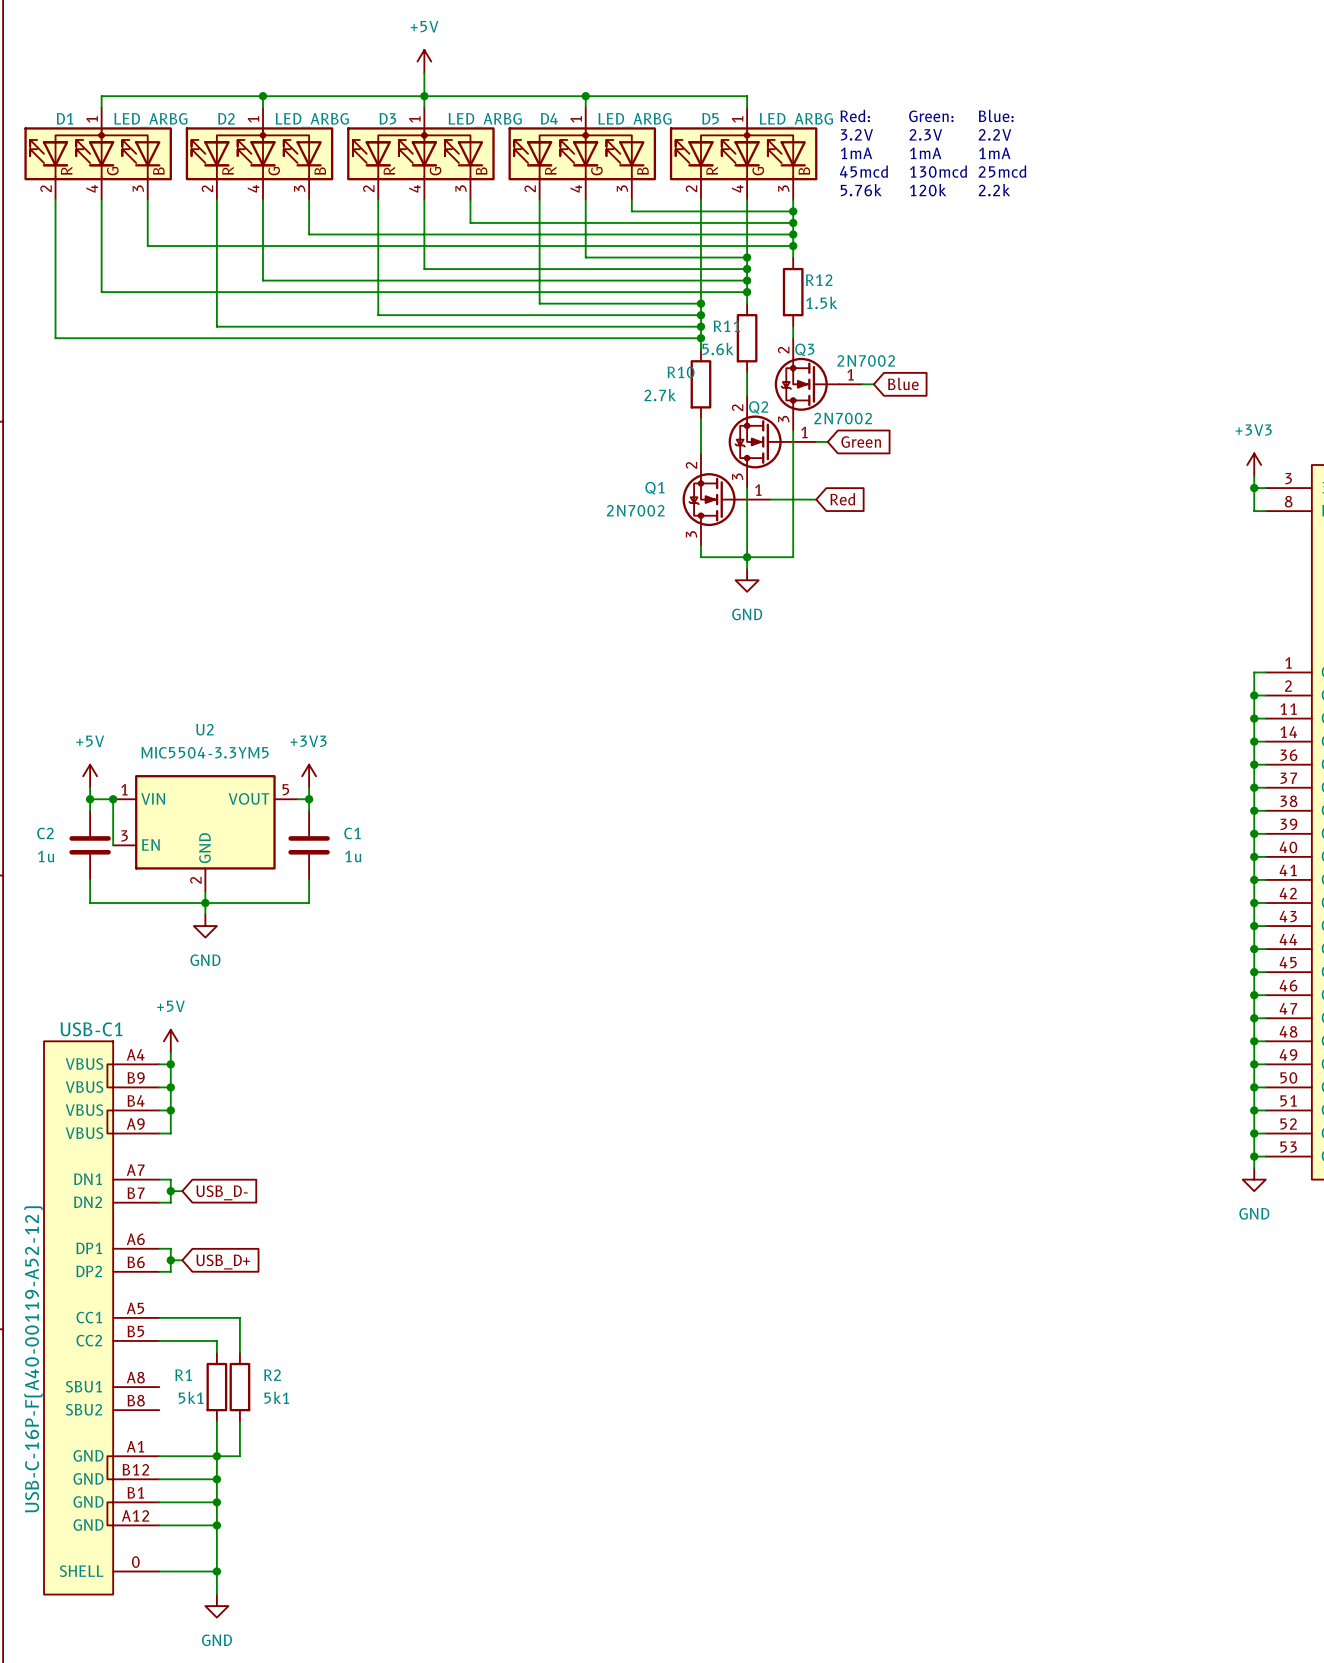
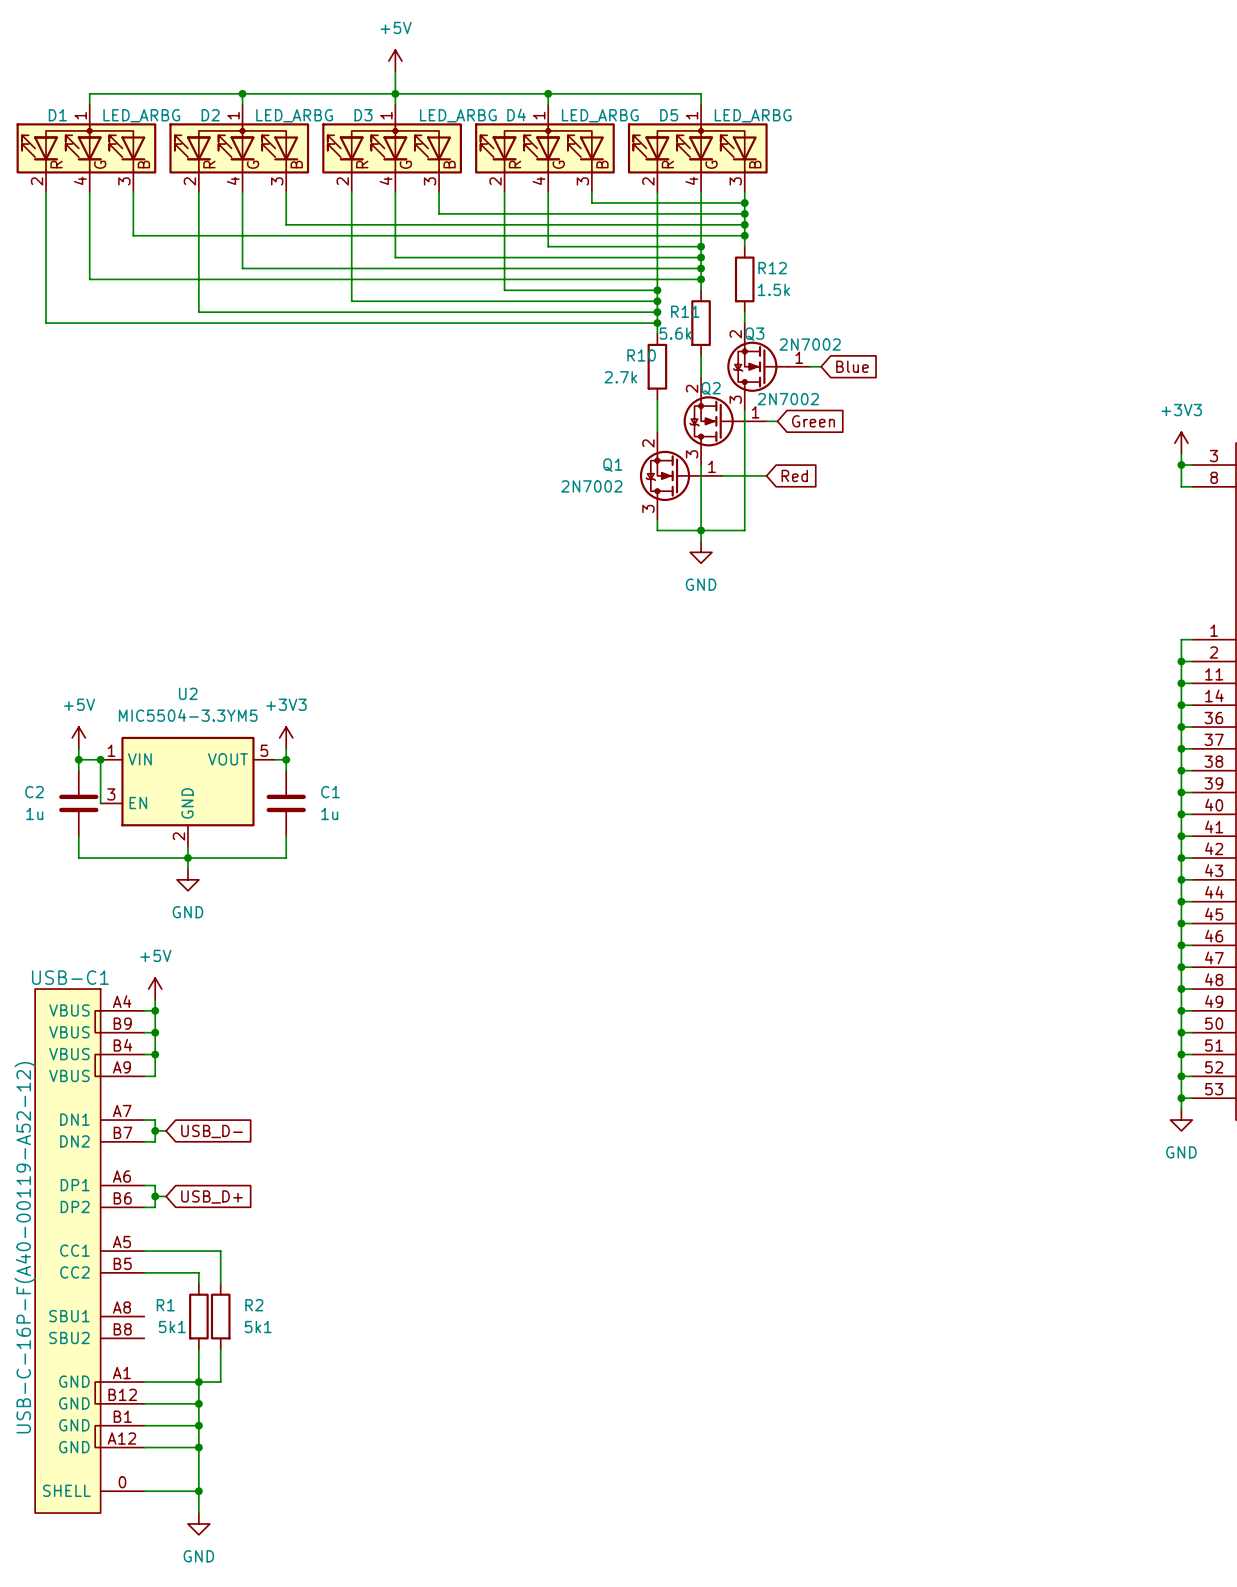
text: Red: (855, 115) -> none
text: Blue: (996, 115) -> none
text: Green: (931, 116) -> none
text: 3.2V (856, 134) -> none
text: 2.3V (925, 134) -> none
text: 2.2V (995, 134) -> none
text: 1mA (856, 153) -> none
text: 1mA (925, 153) -> none
text: 1mA (994, 153) -> none
text: 45mcd (864, 171) -> none
text: 130mcd (938, 171) -> none
text: 25mcd (1002, 171) -> none
text: 5.76k (861, 190) -> none
text: 120k (928, 190) -> none
text: 2.2k (994, 190) -> none

